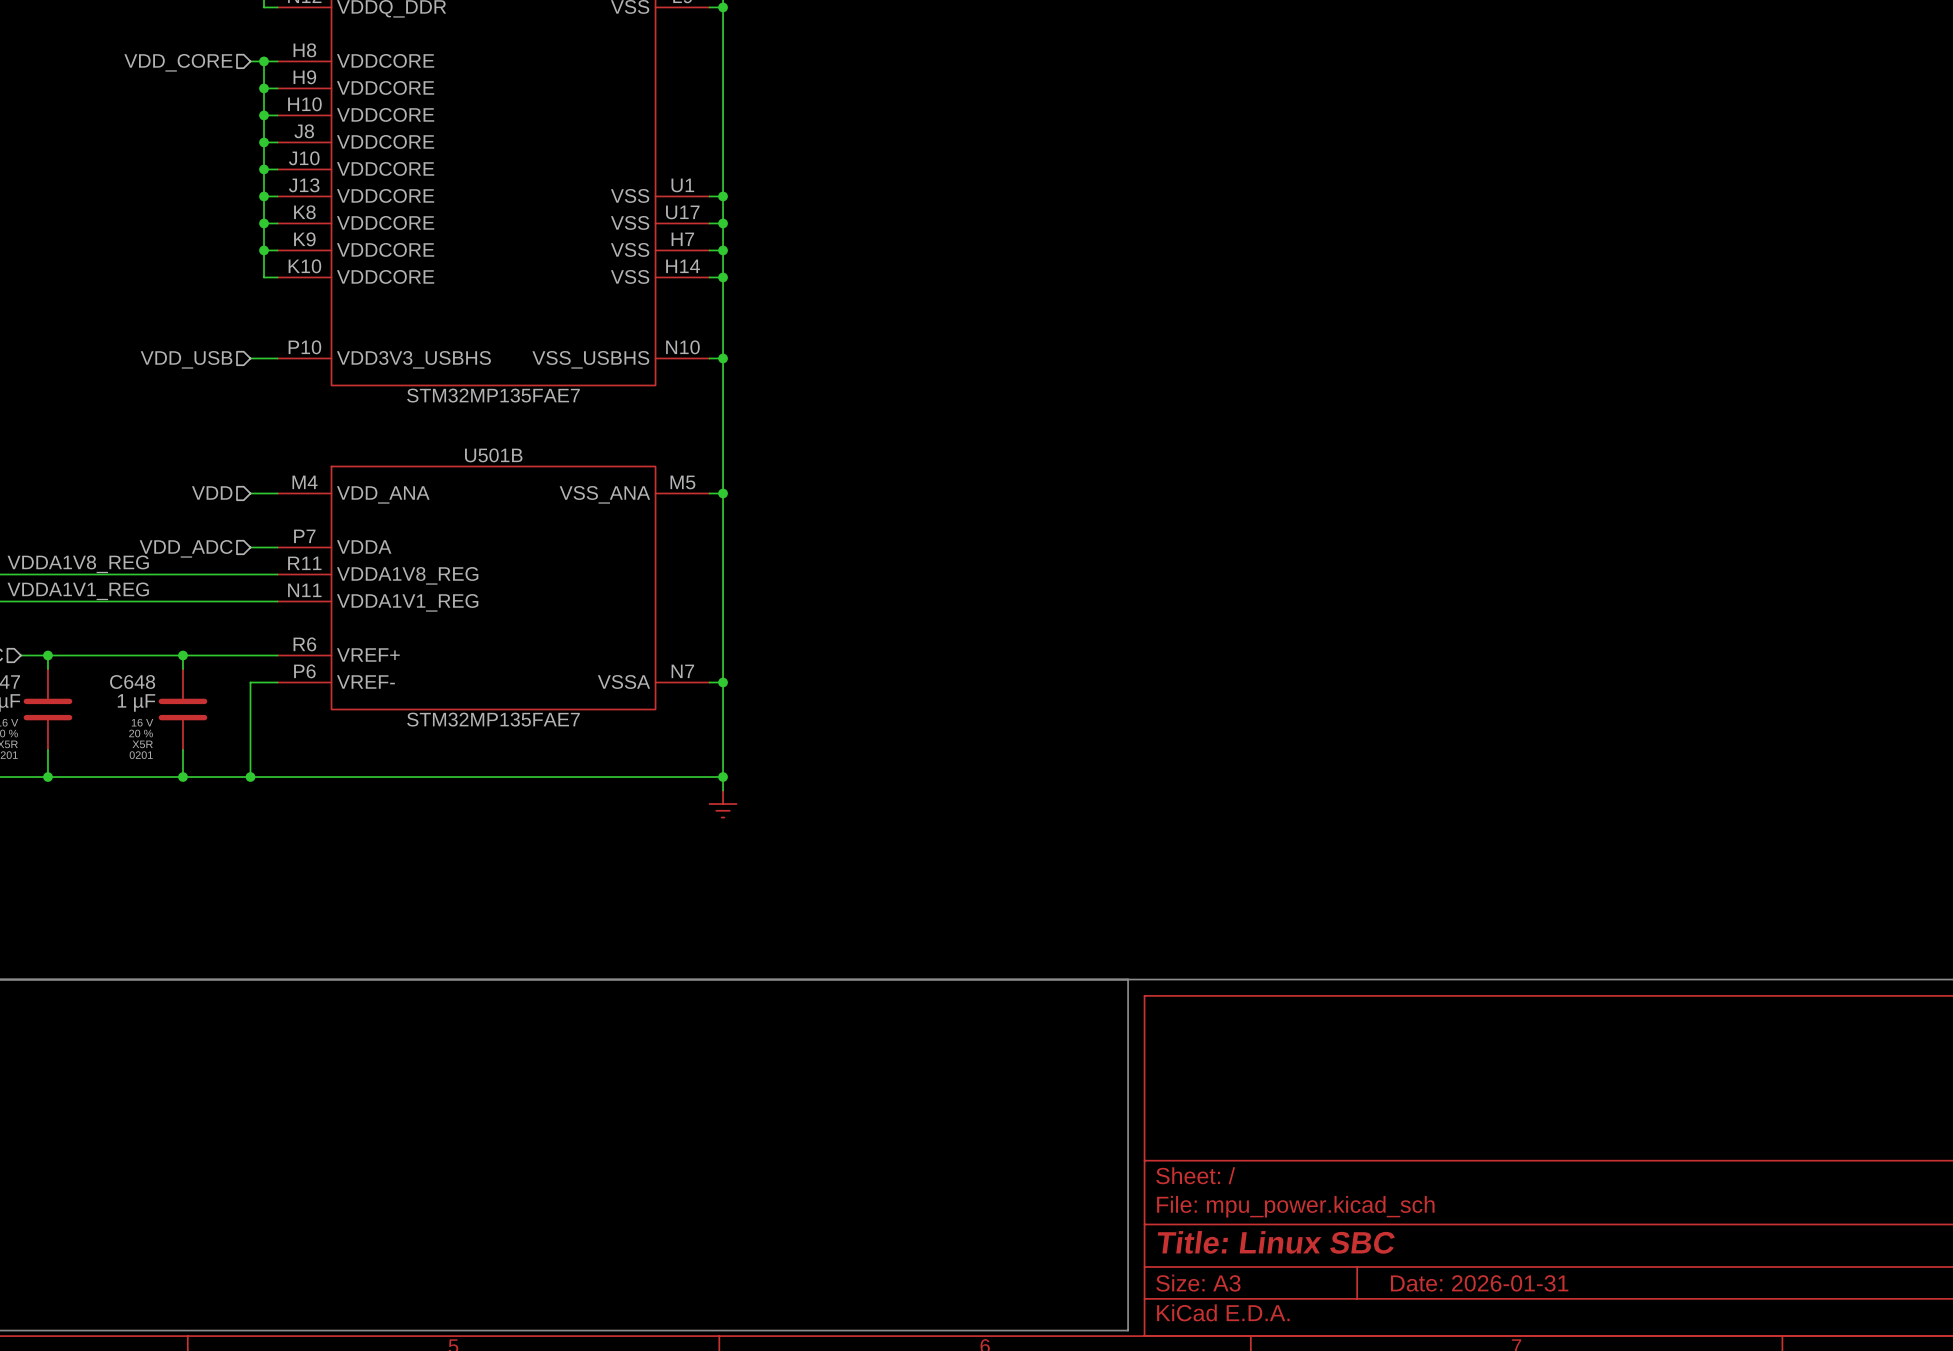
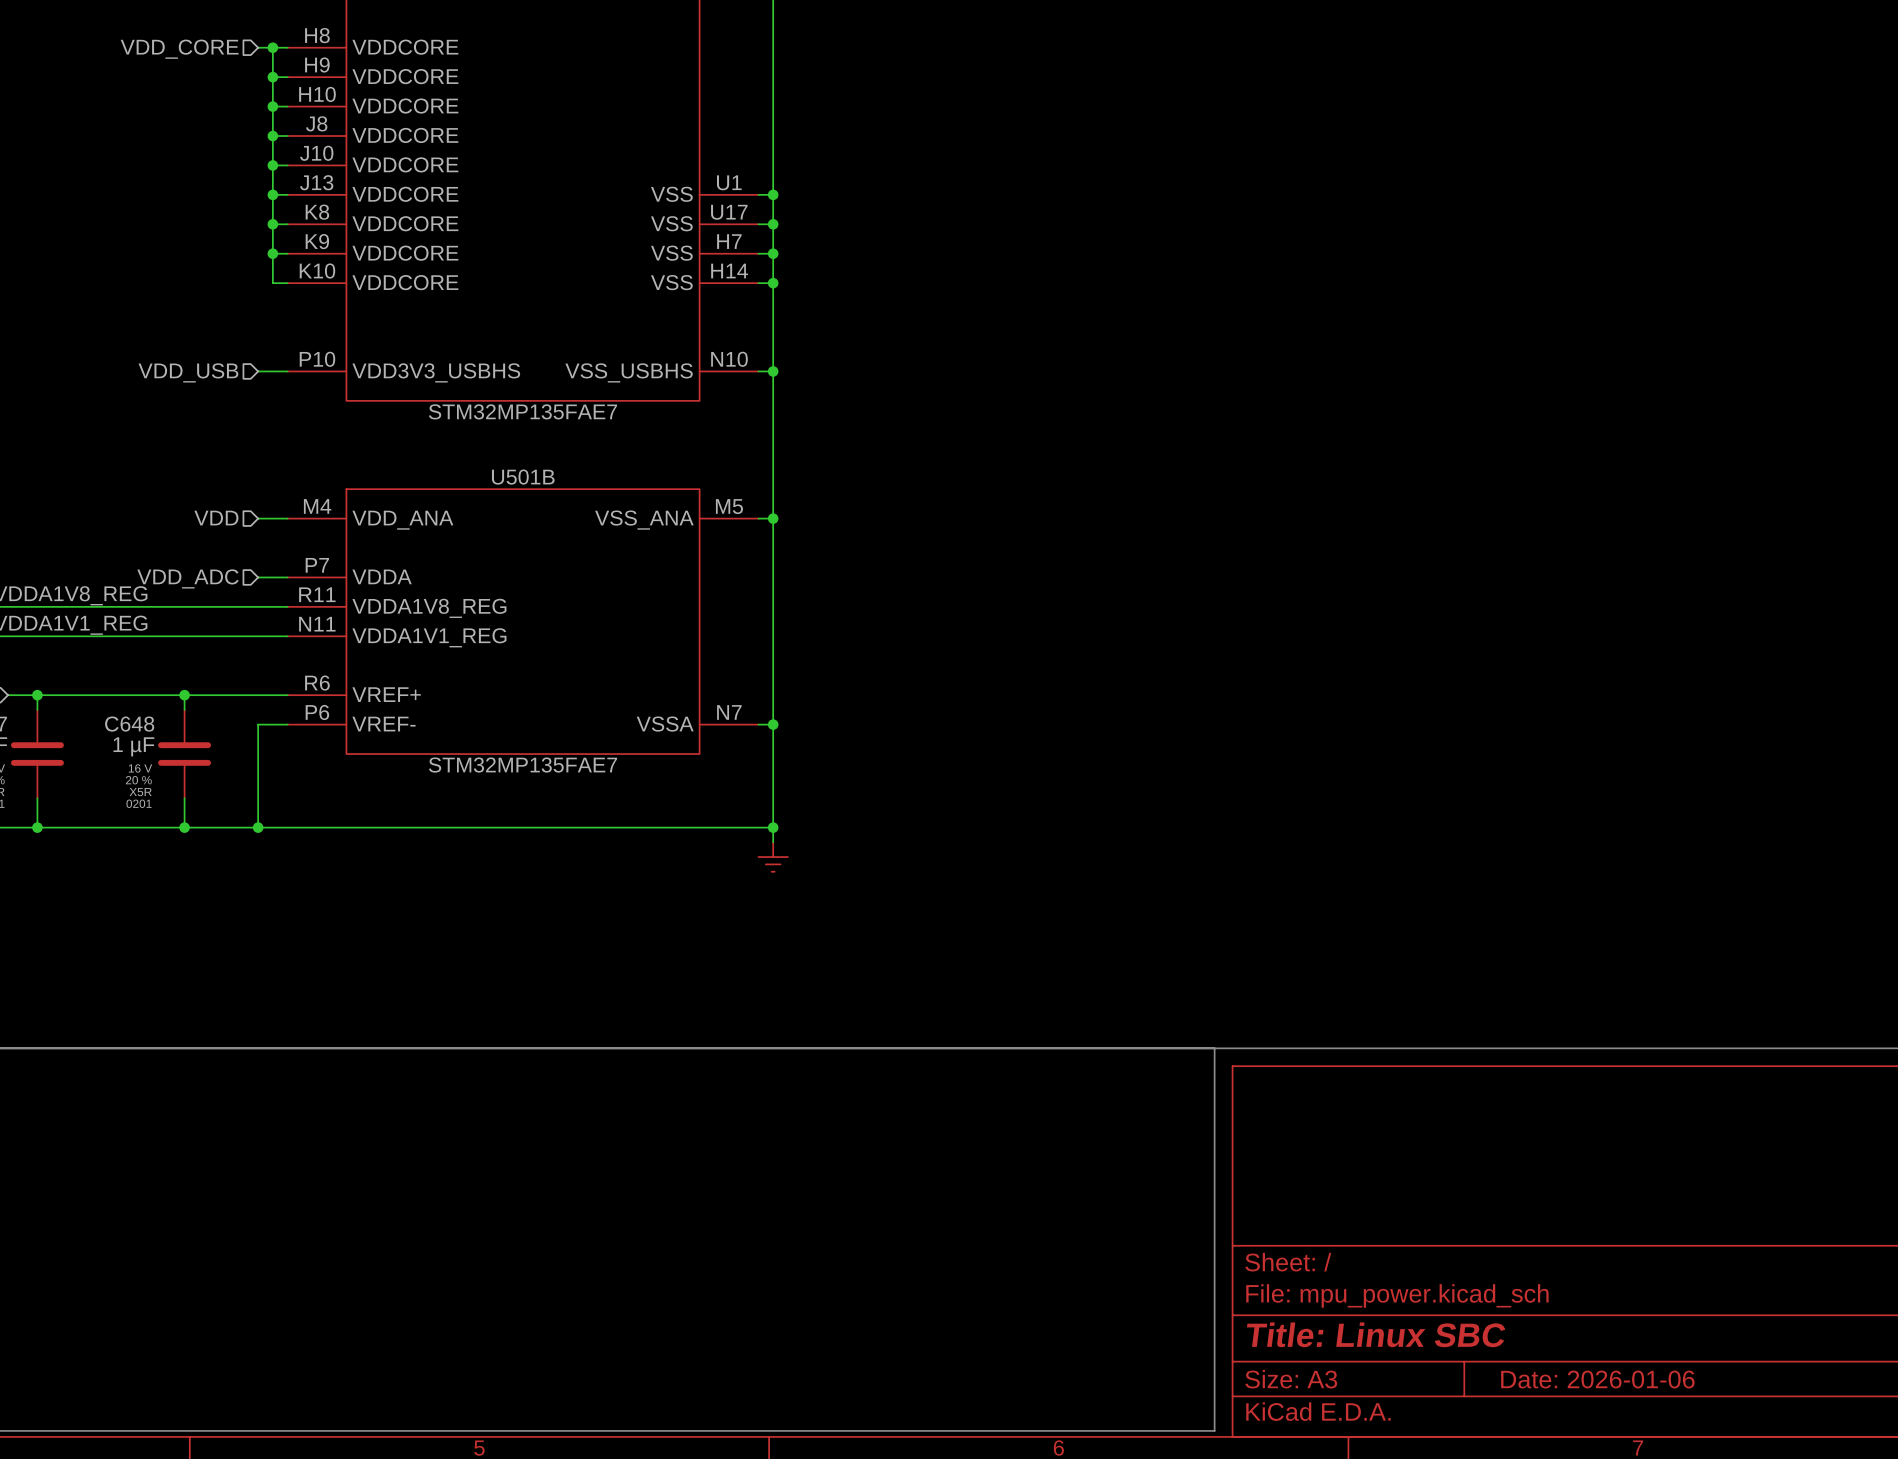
title block: Date: 2026-01-31 (1479, 1283) -> Date: 2026-01-06 (1597, 1379)

